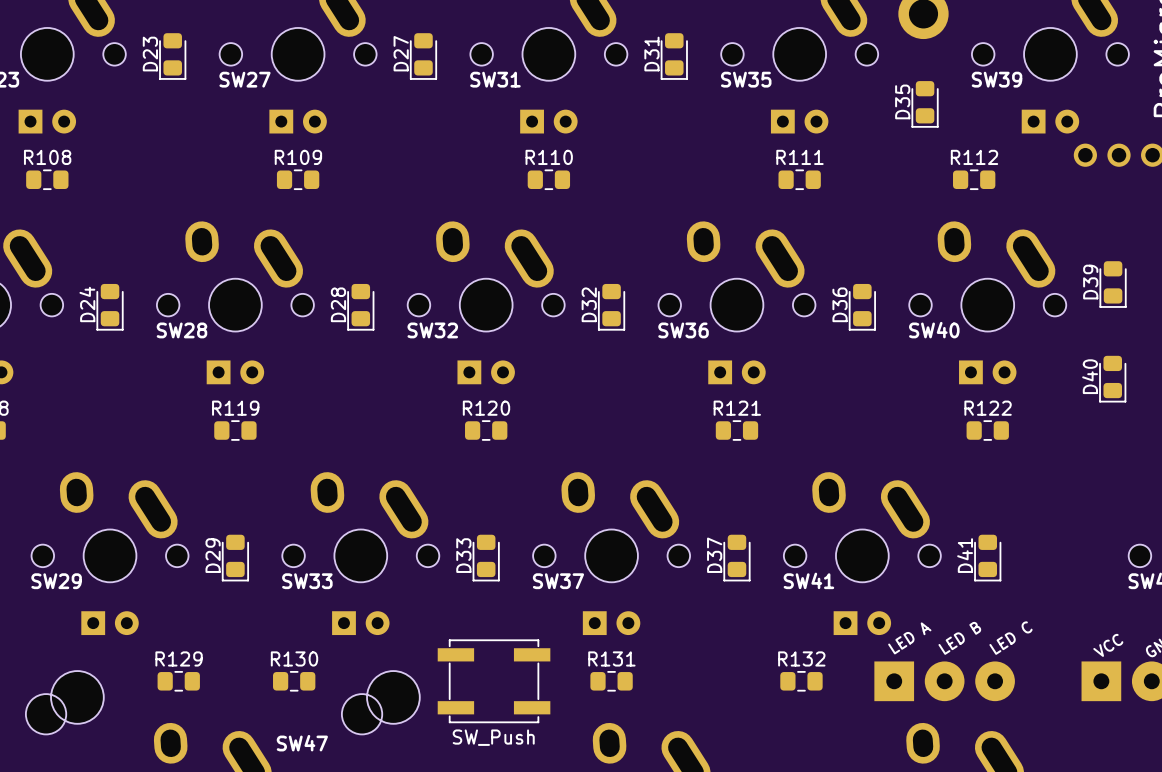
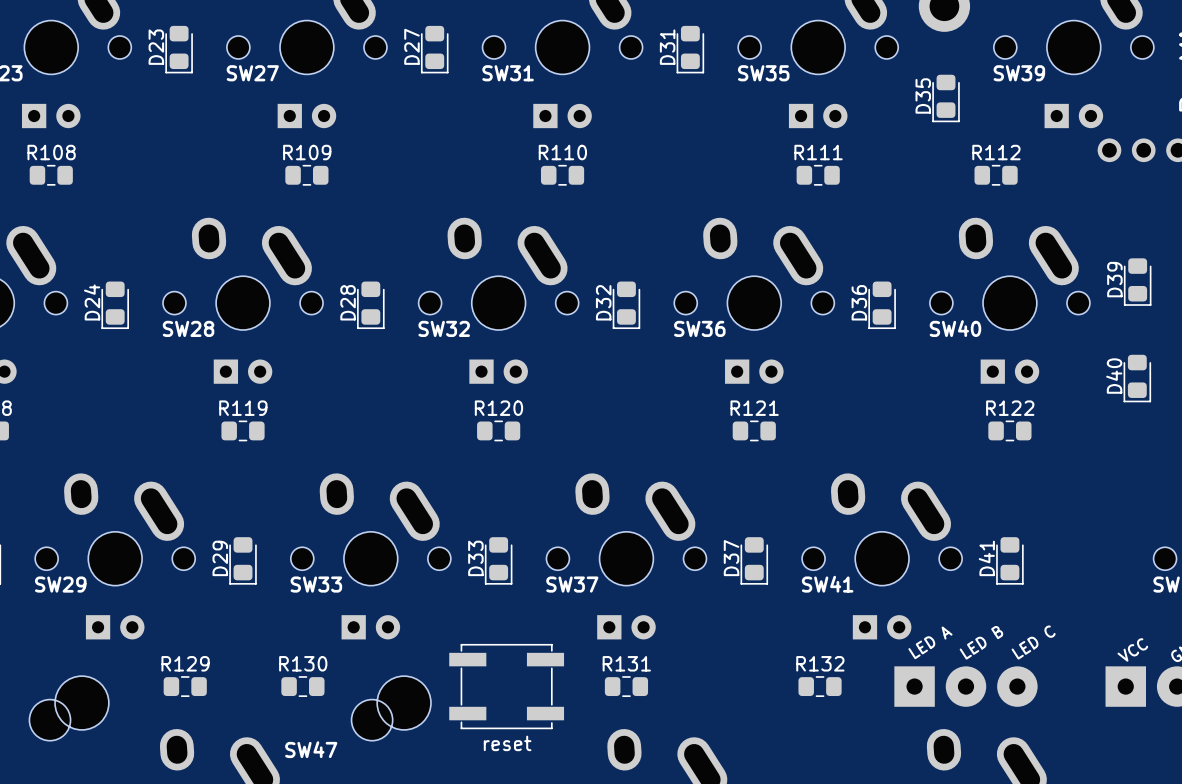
part value: SW_Push (493, 737) -> reset (507, 743)

